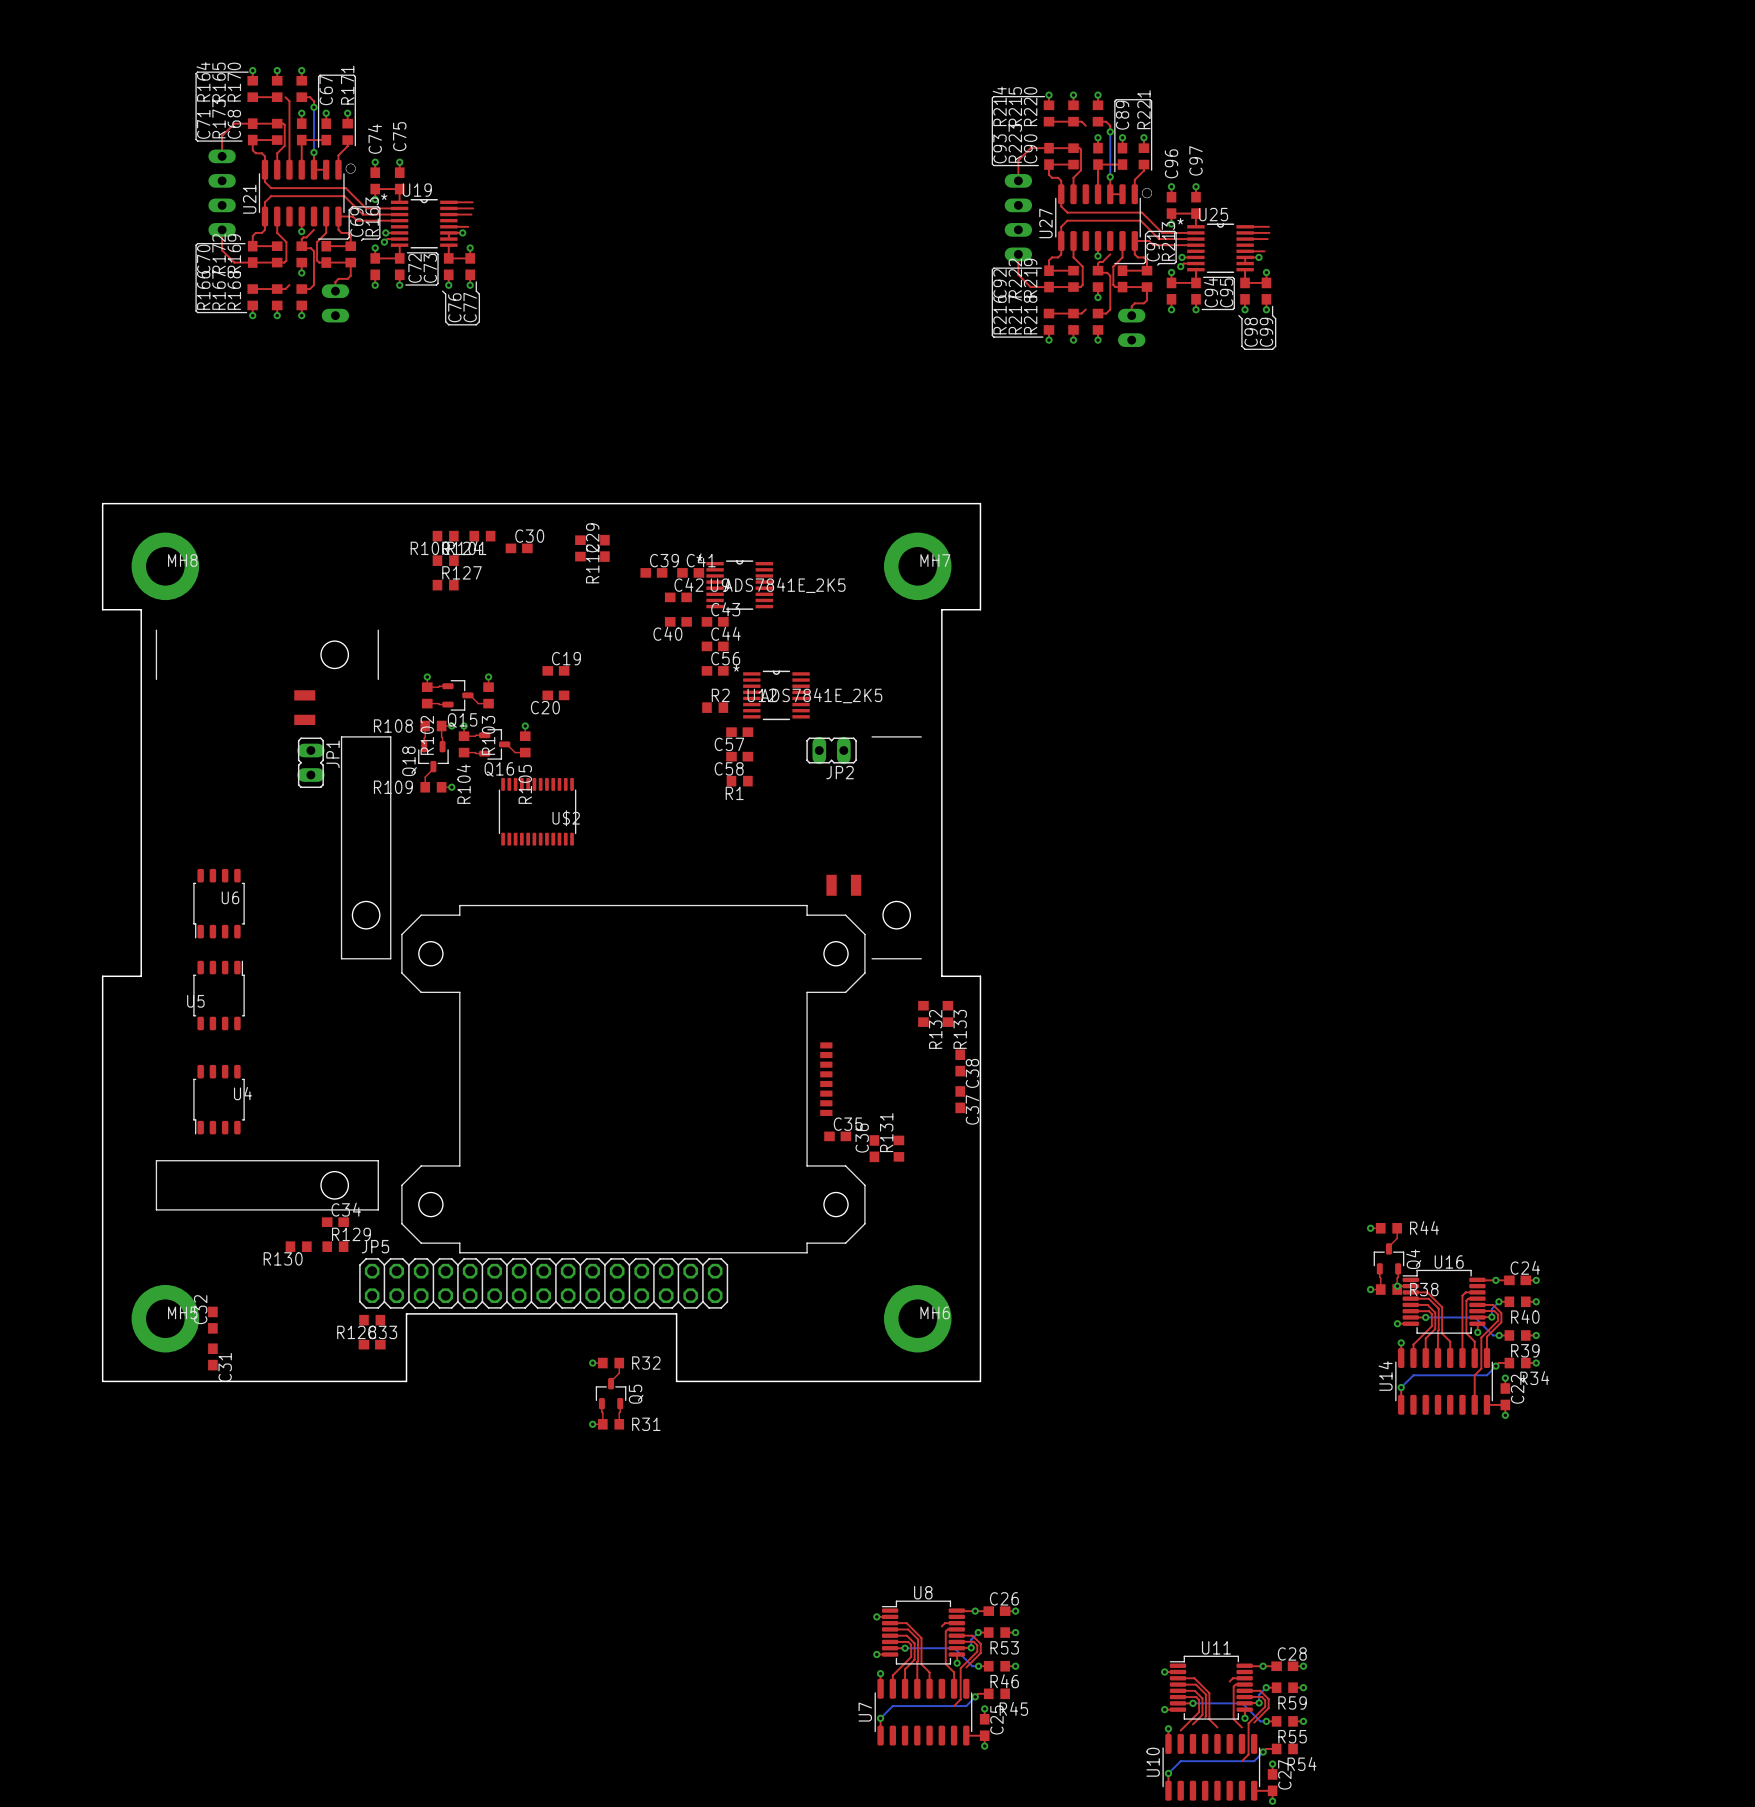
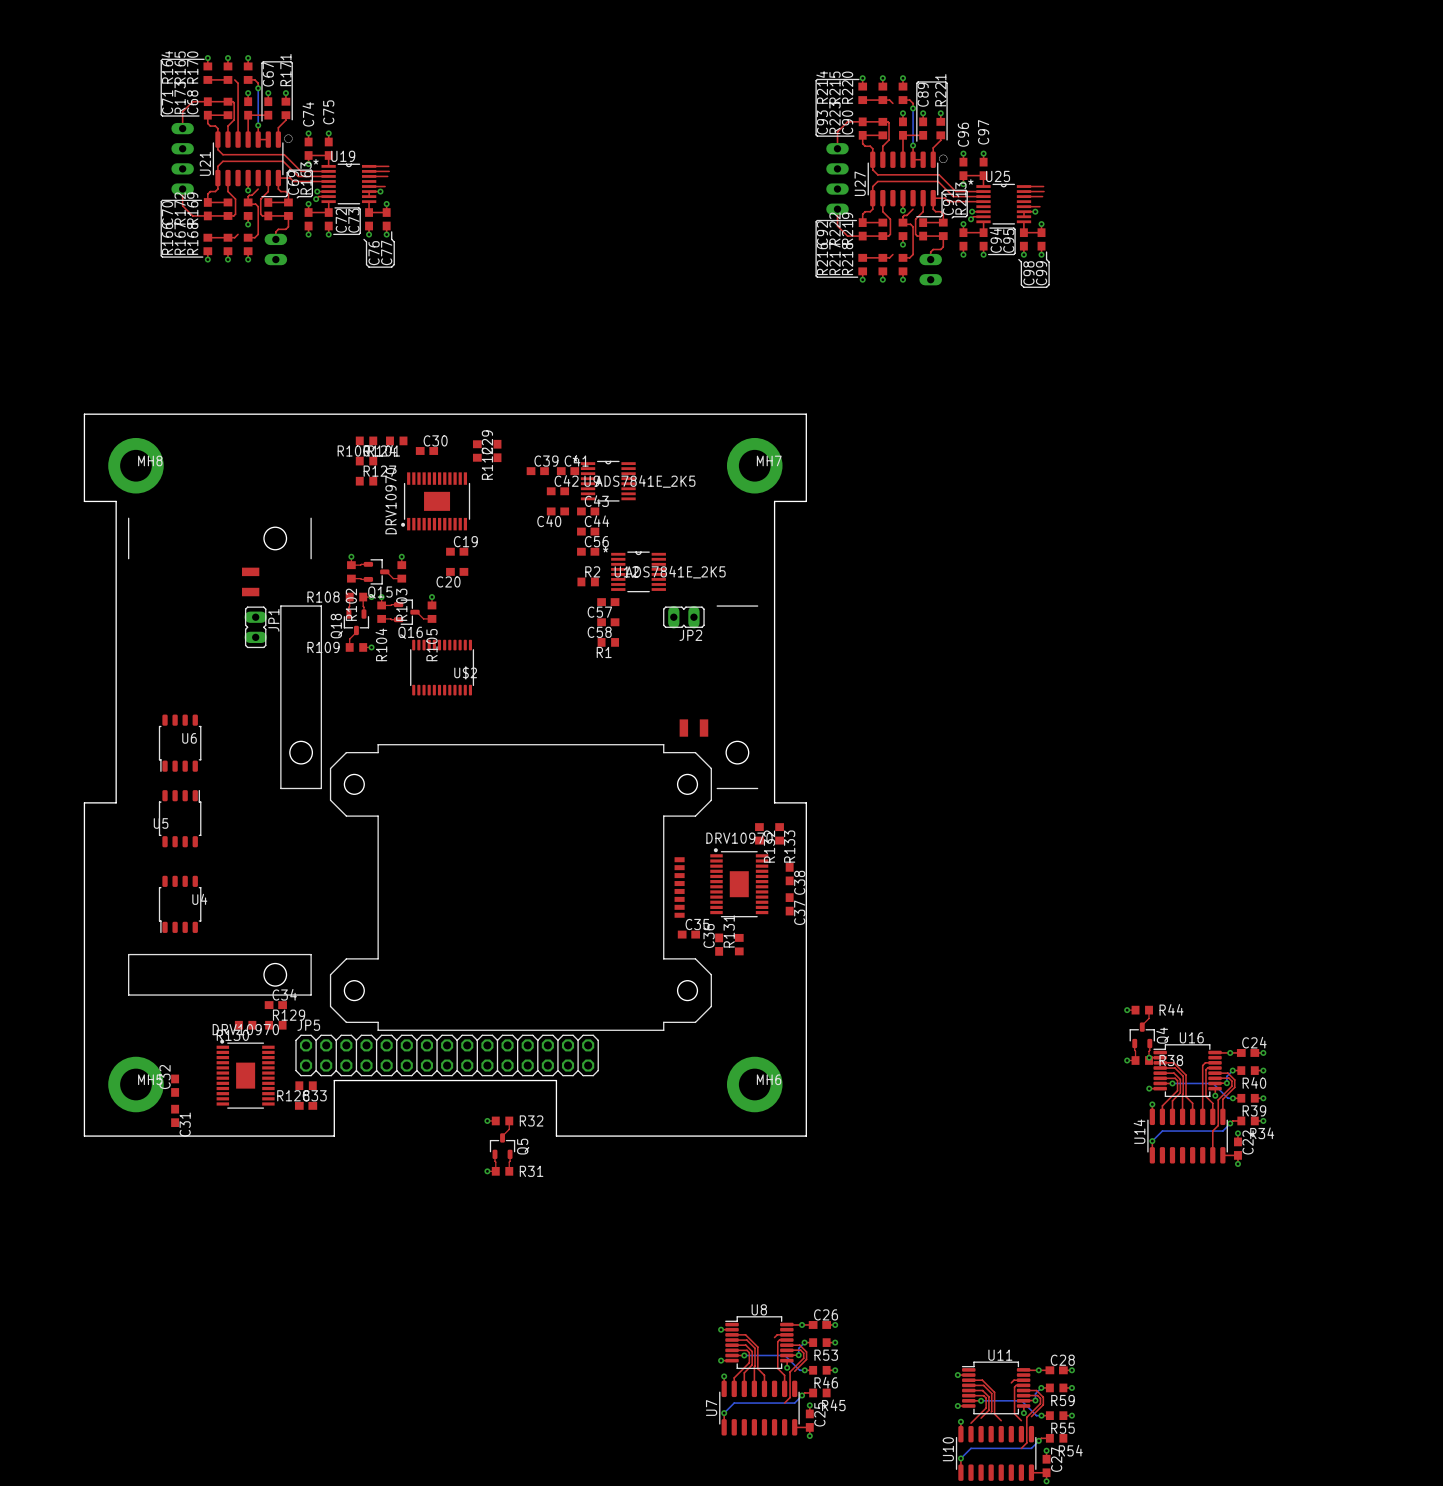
part: none -> (435, 501)
part: none -> (739, 882)
part: none -> (245, 1074)

